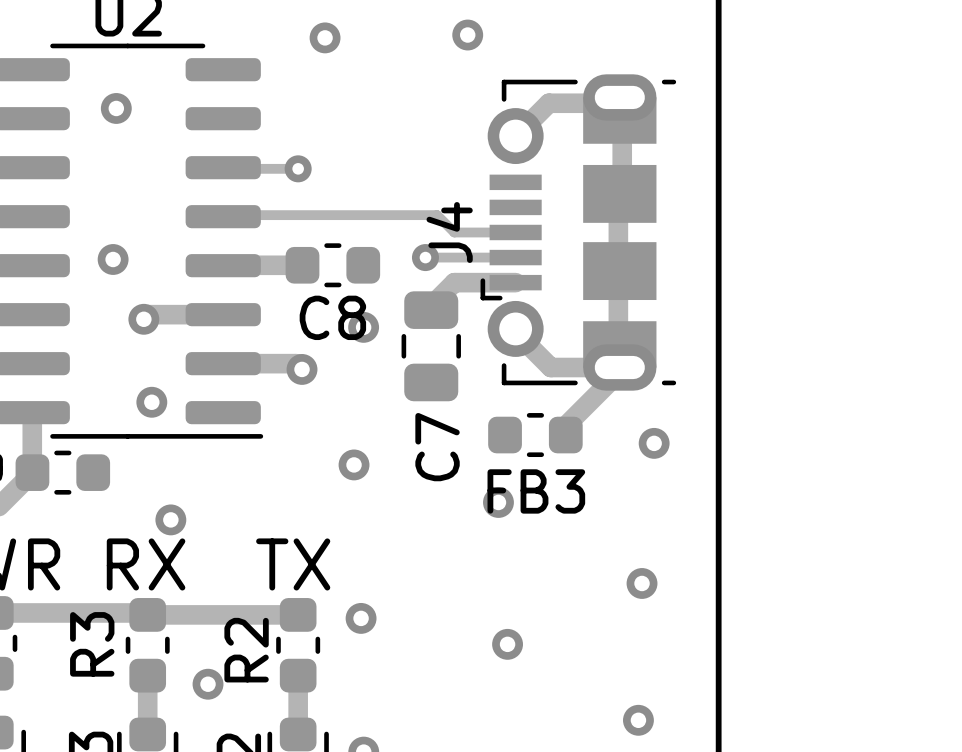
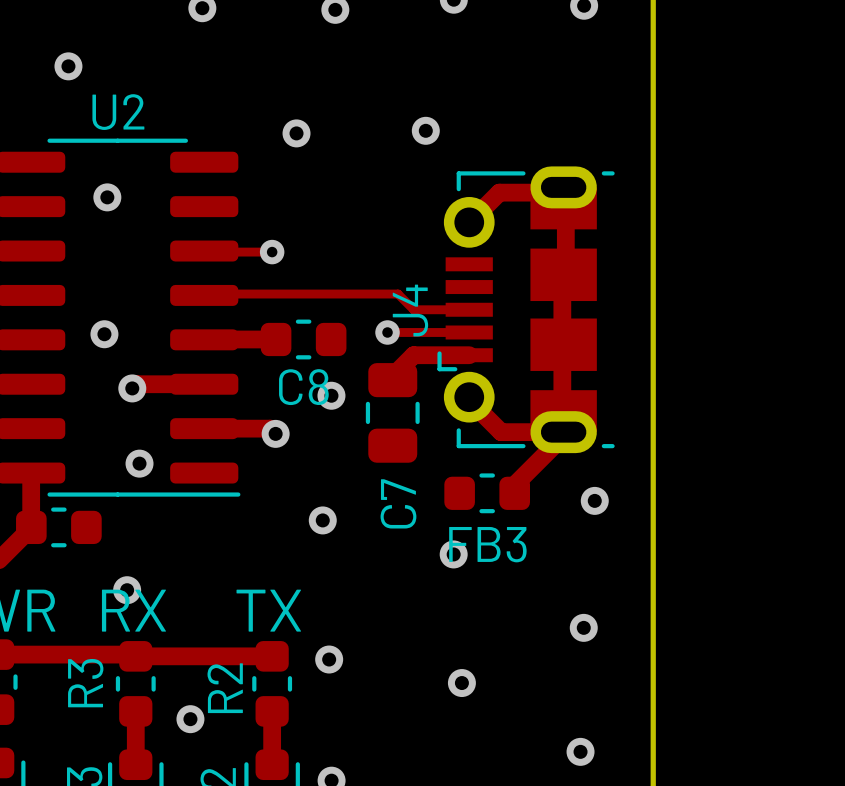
via position: (170, 519) -> (127, 590)

